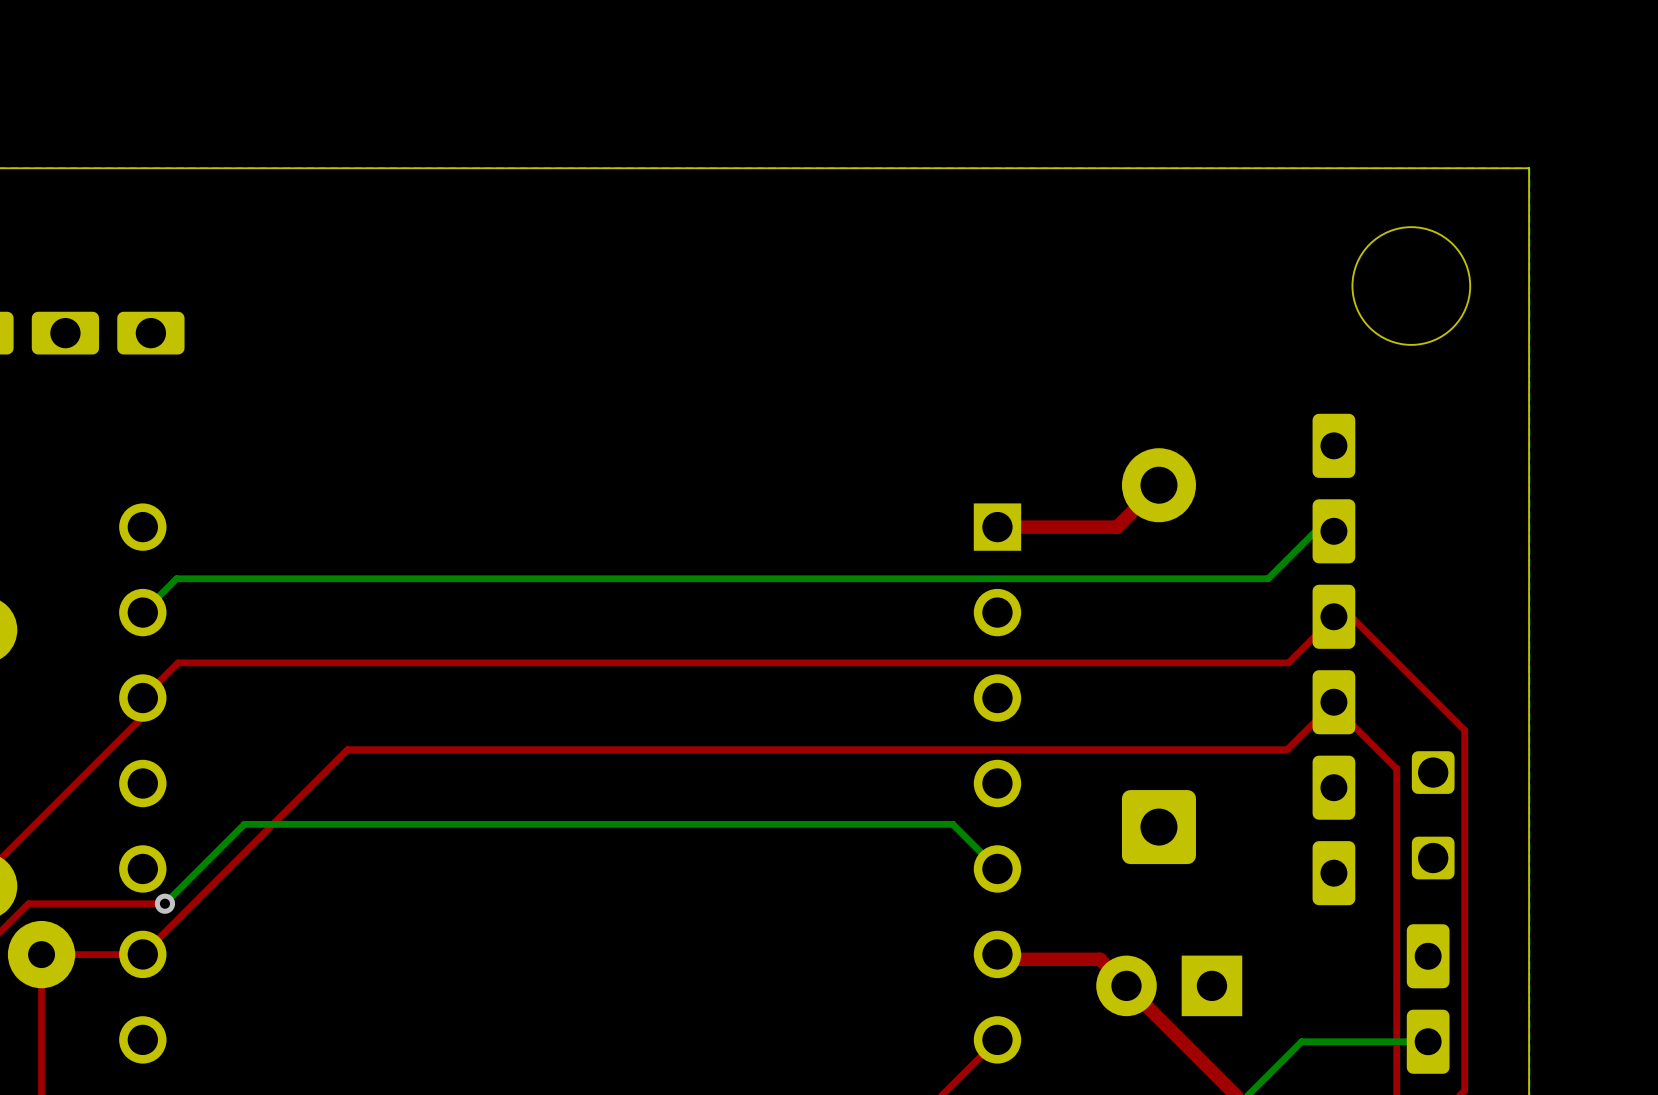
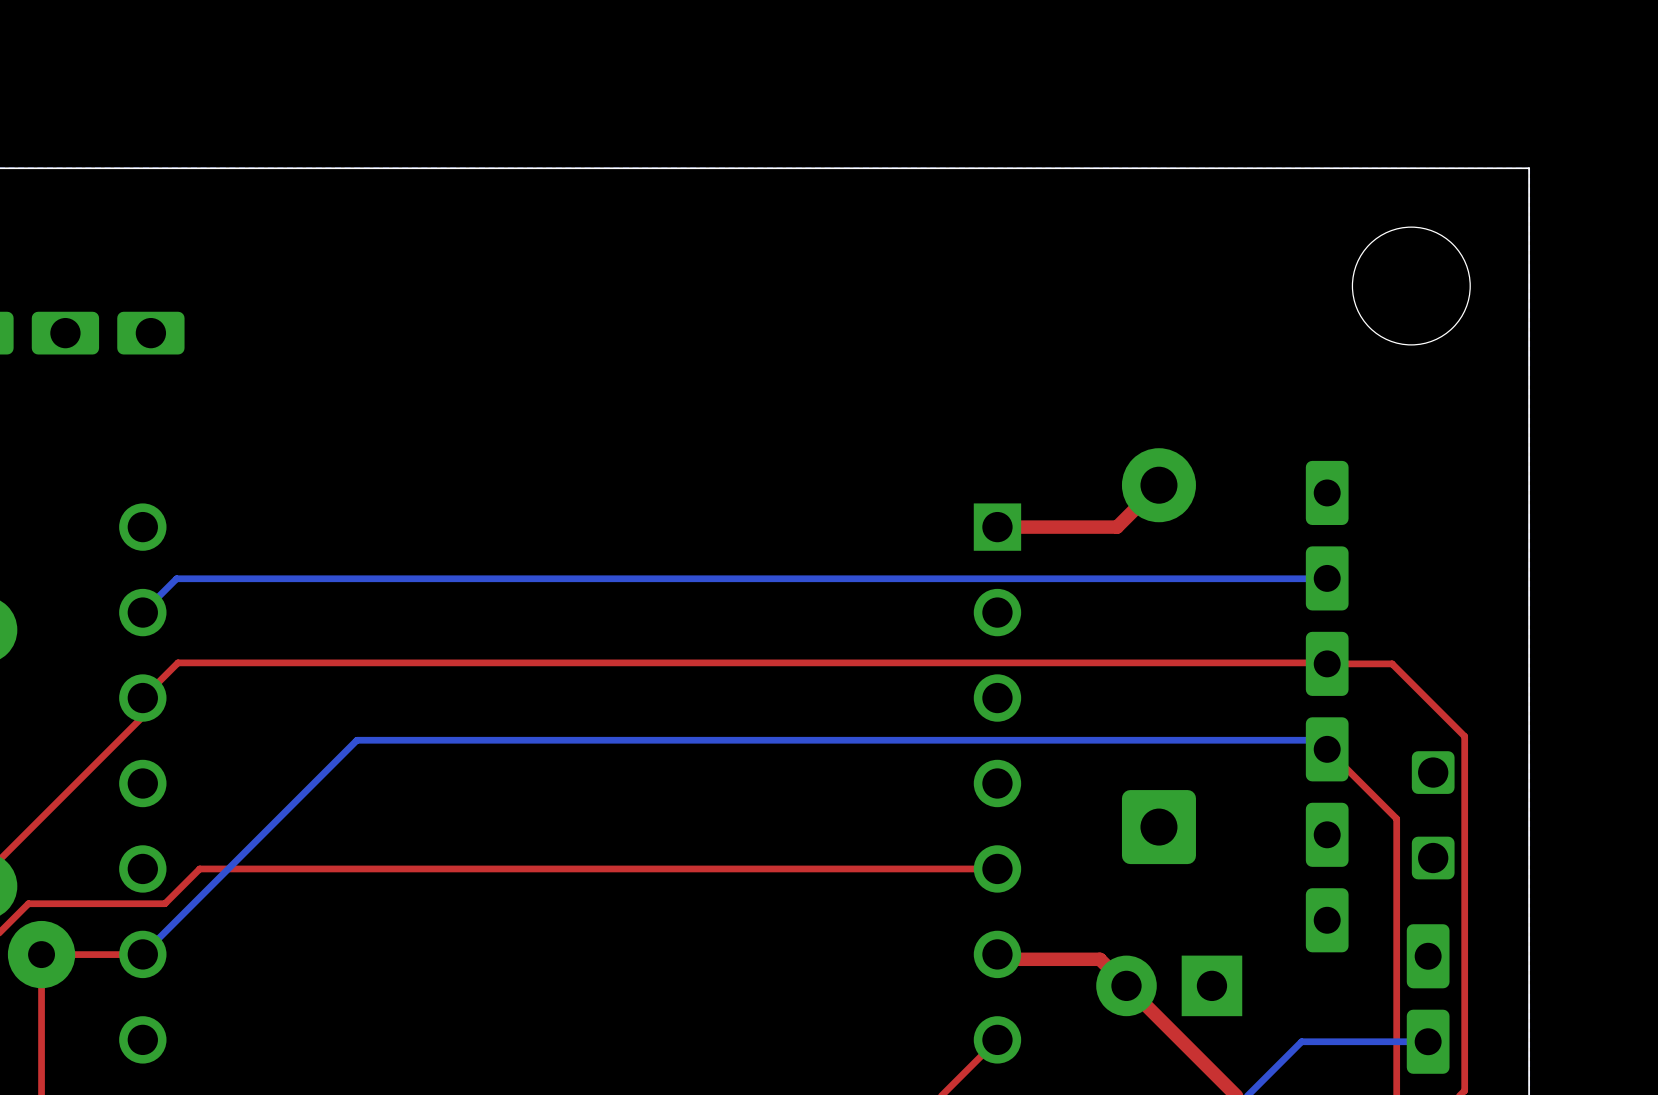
bottom track: (1341, 523) (1337, 520) (1326, 520) (1268, 578) -> (1326, 578) (1268, 578)
part position: (1333, 659) -> (1327, 706)
top track: (1288, 662) (1332, 619) (1353, 619) (1464, 730) (1464, 736) -> (1288, 662) (1392, 663) (1464, 736)
bottom track: none -> (1327, 749) (1321, 749) (1312, 740) (356, 740) (142, 954)
top track: (1396, 768) (1396, 818) -> (1327, 749) (1396, 818)
top track: (1396, 768) (1332, 704) (1287, 749) (347, 749) (142, 954) -> none
bottom track: (996, 868) (952, 824) (244, 824) (164, 903) -> none
top track: none -> (997, 868) (199, 868) (164, 903)
via: (164, 903) -> none

